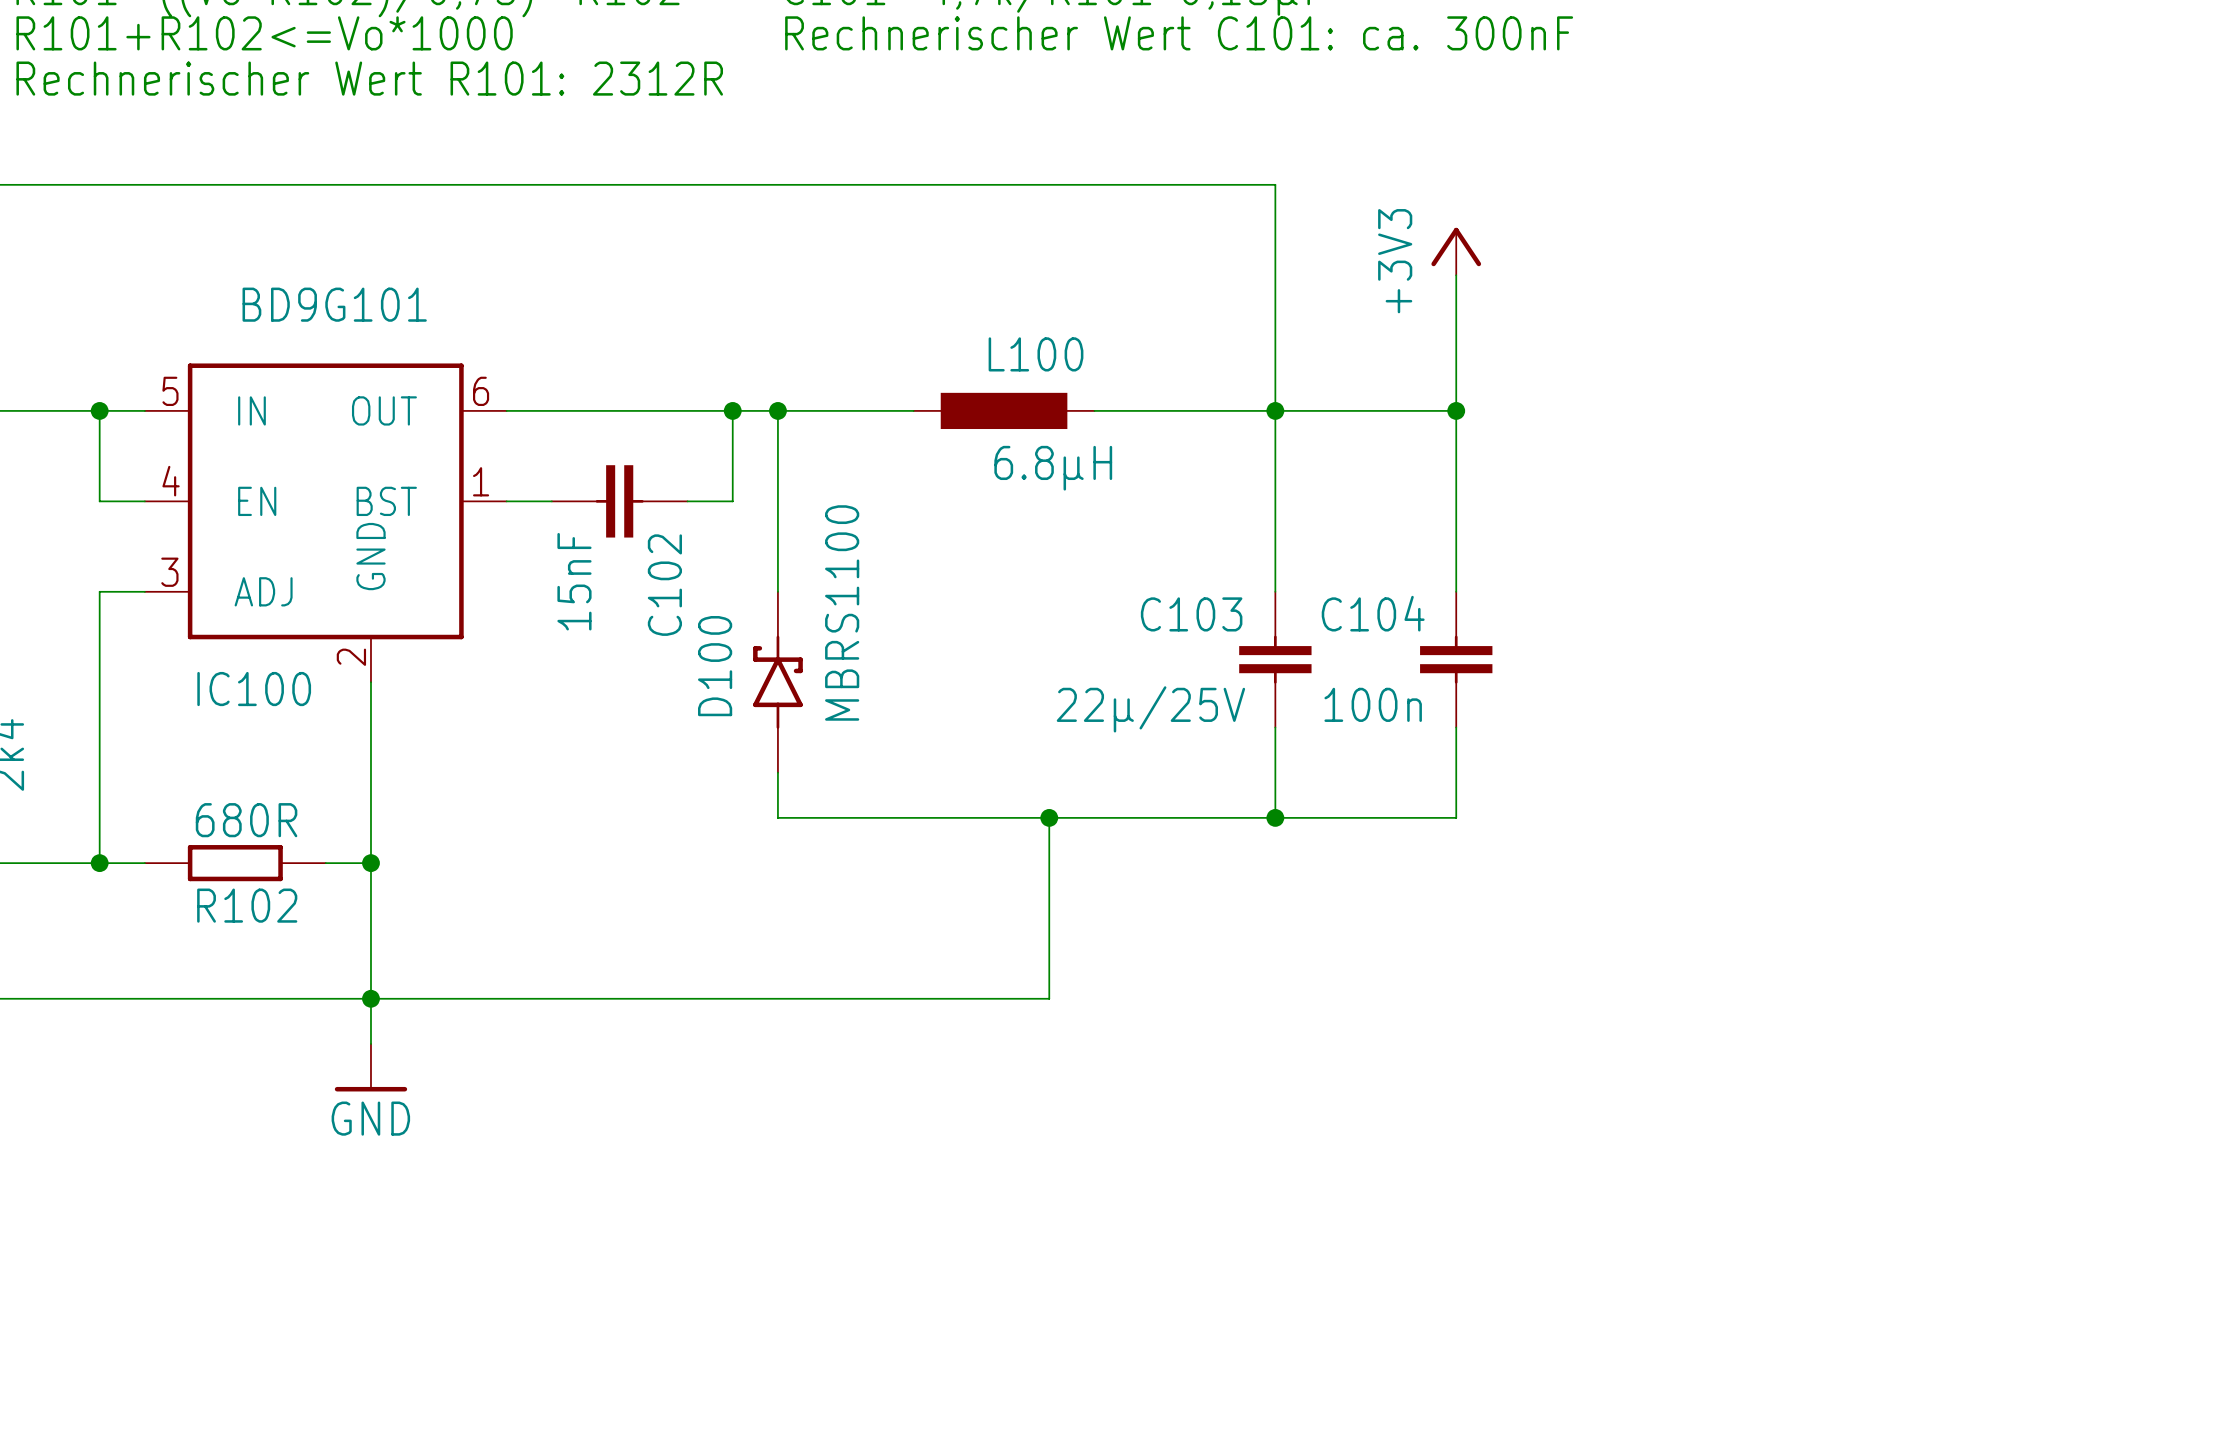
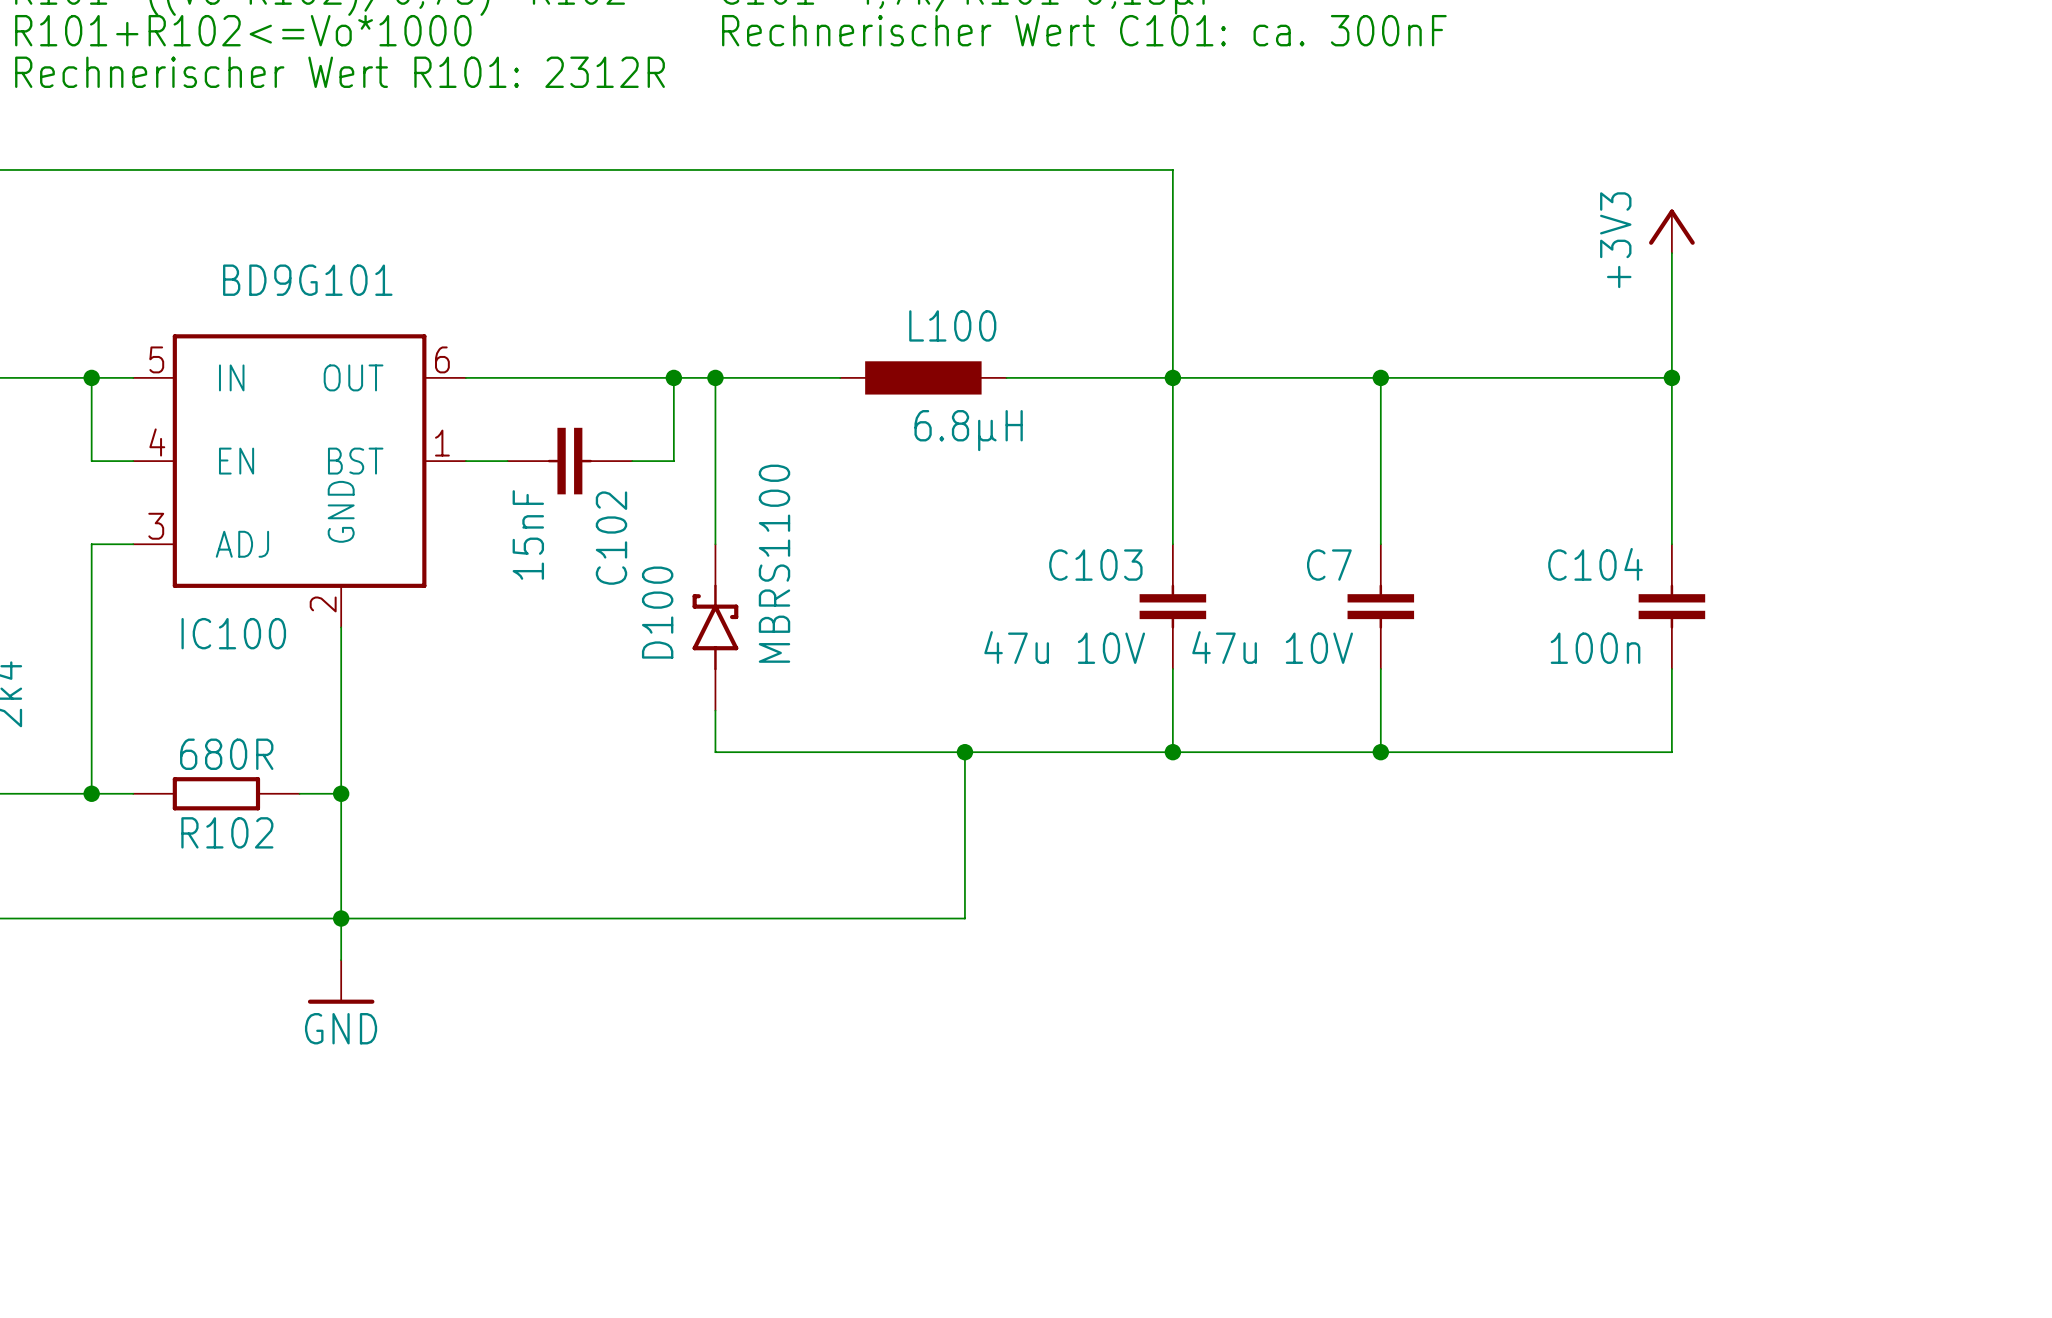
power symbol position: +3V3 (1456, 251) -> +3V3 (1671, 231)
wire: (1456, 275) (1456, 591) -> (1671, 253) (1671, 544)
wire: none -> (1339, 377) (1671, 377)
junction position: (1456, 410) -> (1380, 377)
wire: none -> (1380, 377) (1380, 544)
junction: none -> (1671, 377)
C104 position: (1456, 659) -> (1671, 606)
C7: none -> 47u 10V (1380, 606)
C103 value: 22µ/25V (1150, 709) -> 47u 10V (1064, 647)
wire: (1456, 727) (1456, 817) -> (1671, 669) (1671, 752) (1339, 752)
wire: none -> (1380, 669) (1380, 752)
junction: none -> (1380, 752)

